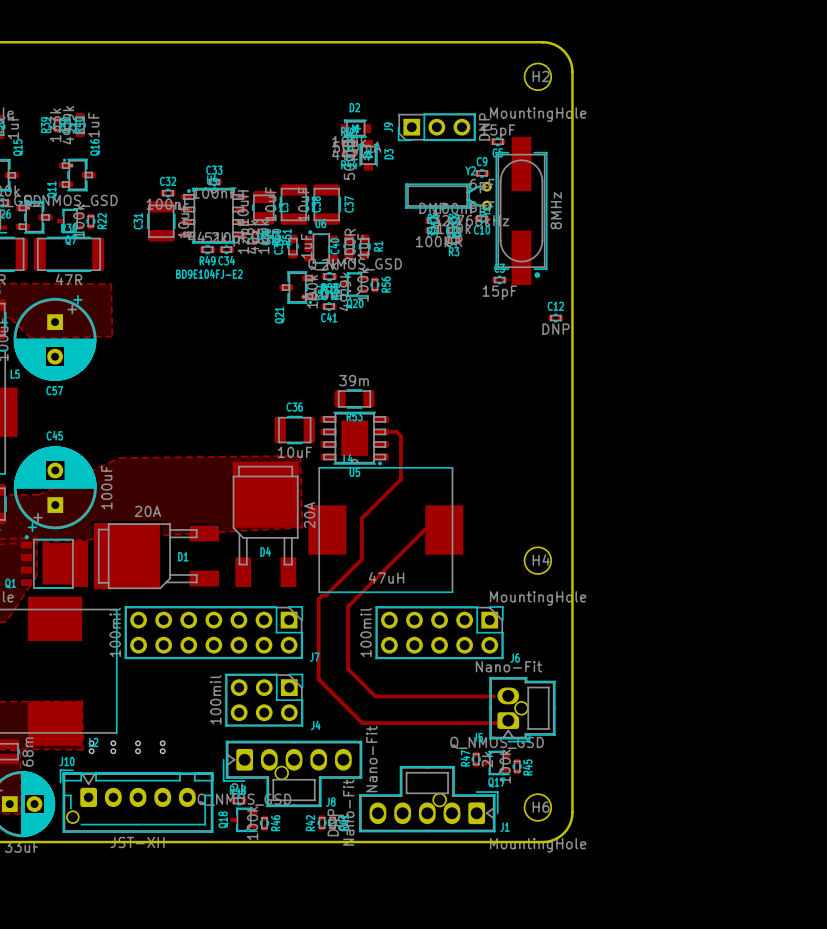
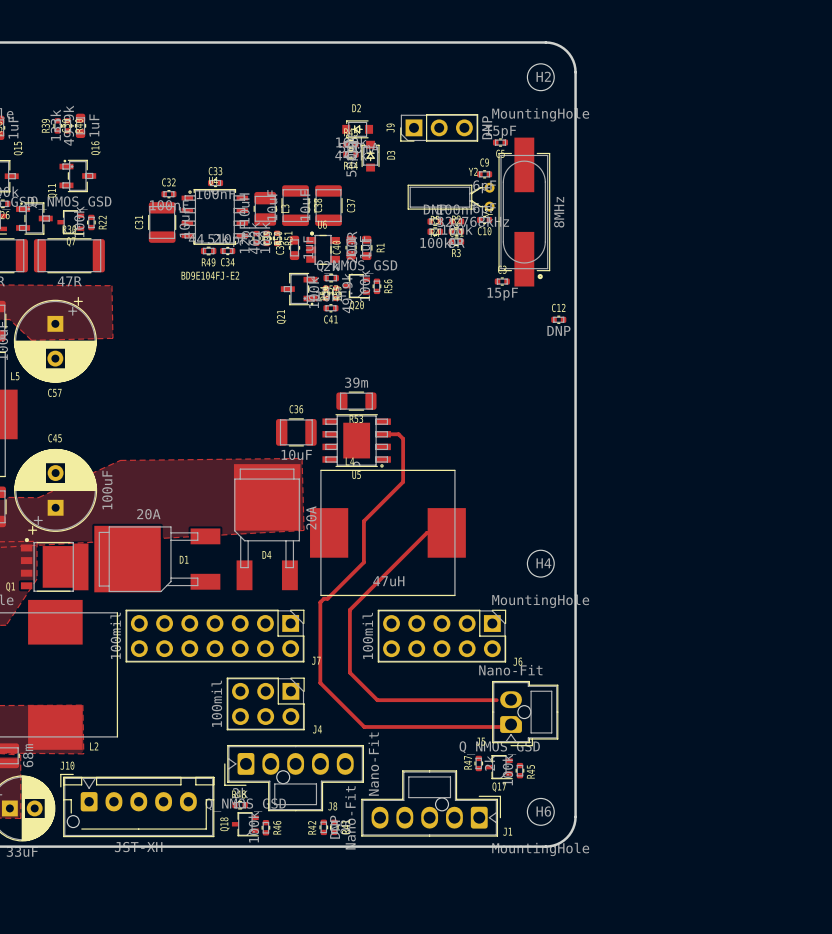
via: (91, 743) -> none
via: (113, 743) -> none
via: (138, 743) -> none
via: (162, 743) -> none
via: (91, 751) -> none
via: (113, 751) -> none
via: (138, 751) -> none
via: (162, 751) -> none

